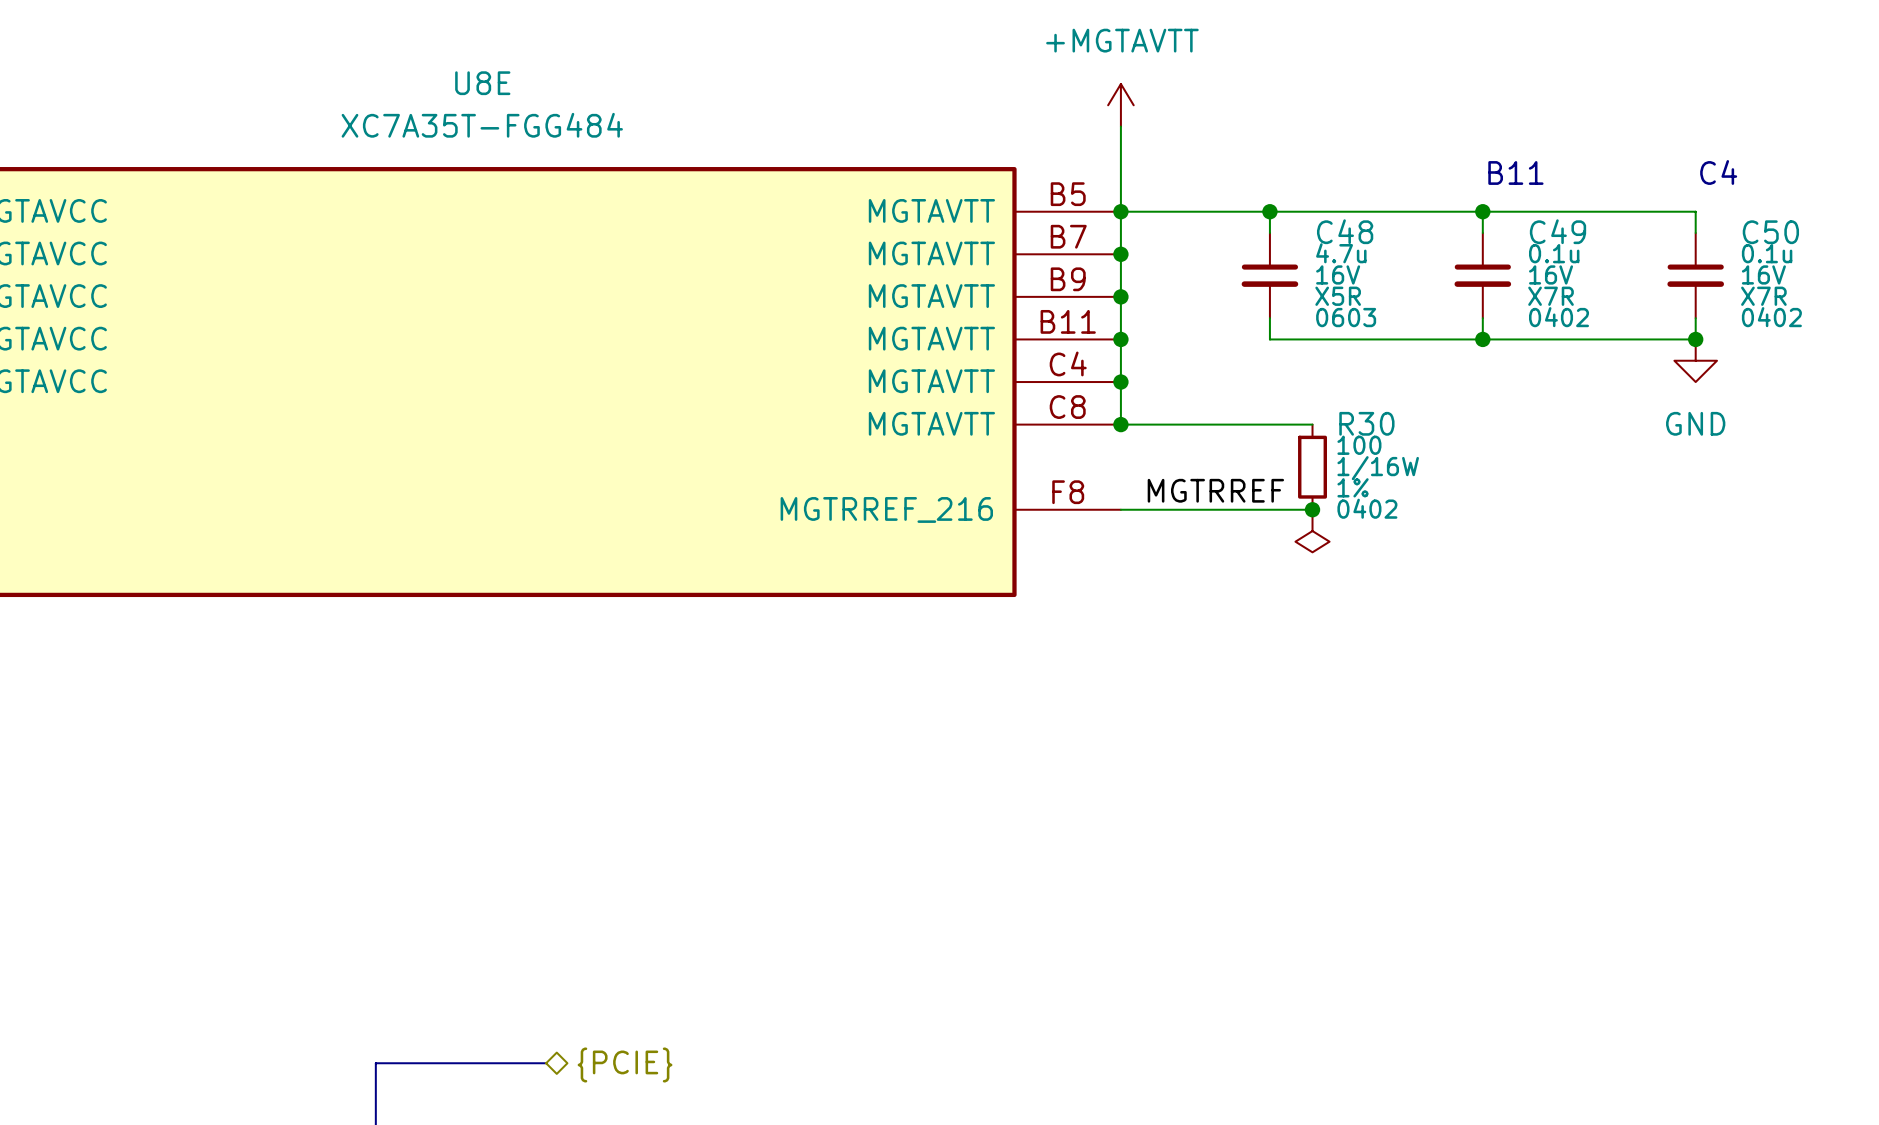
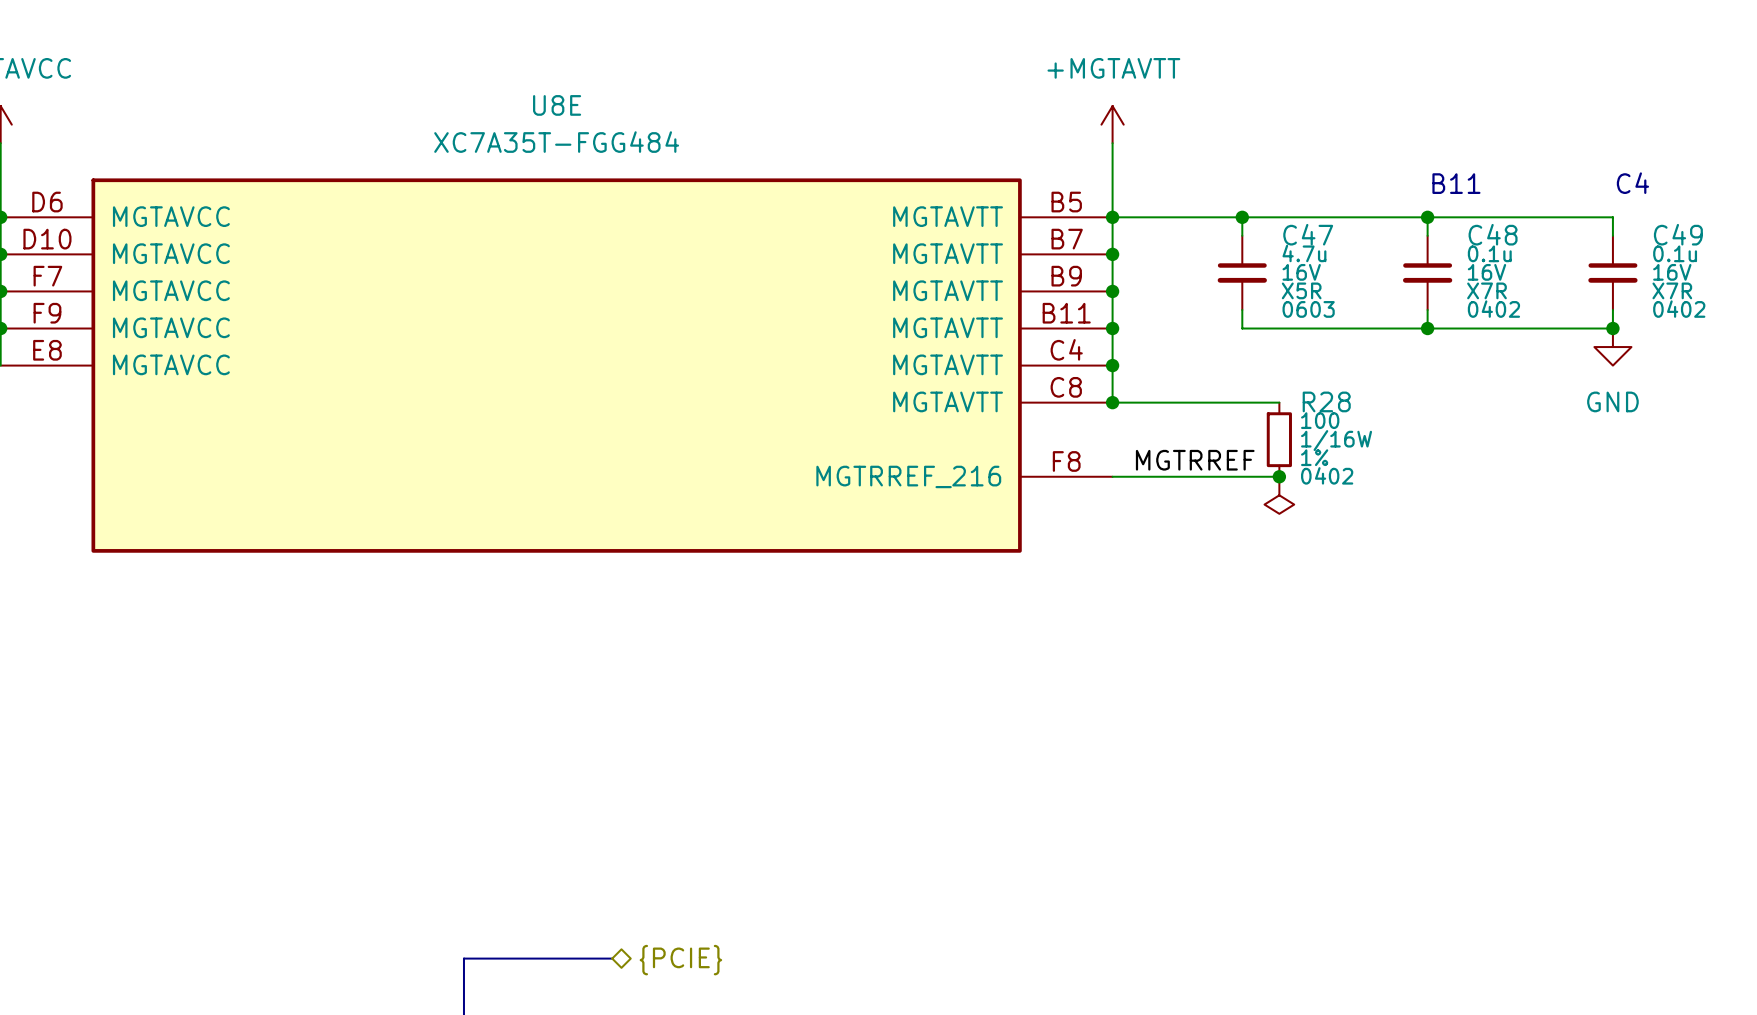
C48 name: C48 (1345, 231) -> C47 (1308, 234)
C49 name: C49 (1557, 231) -> C48 (1493, 234)
C50 name: C50 (1770, 232) -> C49 (1678, 234)
R30 name: R30 (1366, 423) -> R28 (1326, 401)

